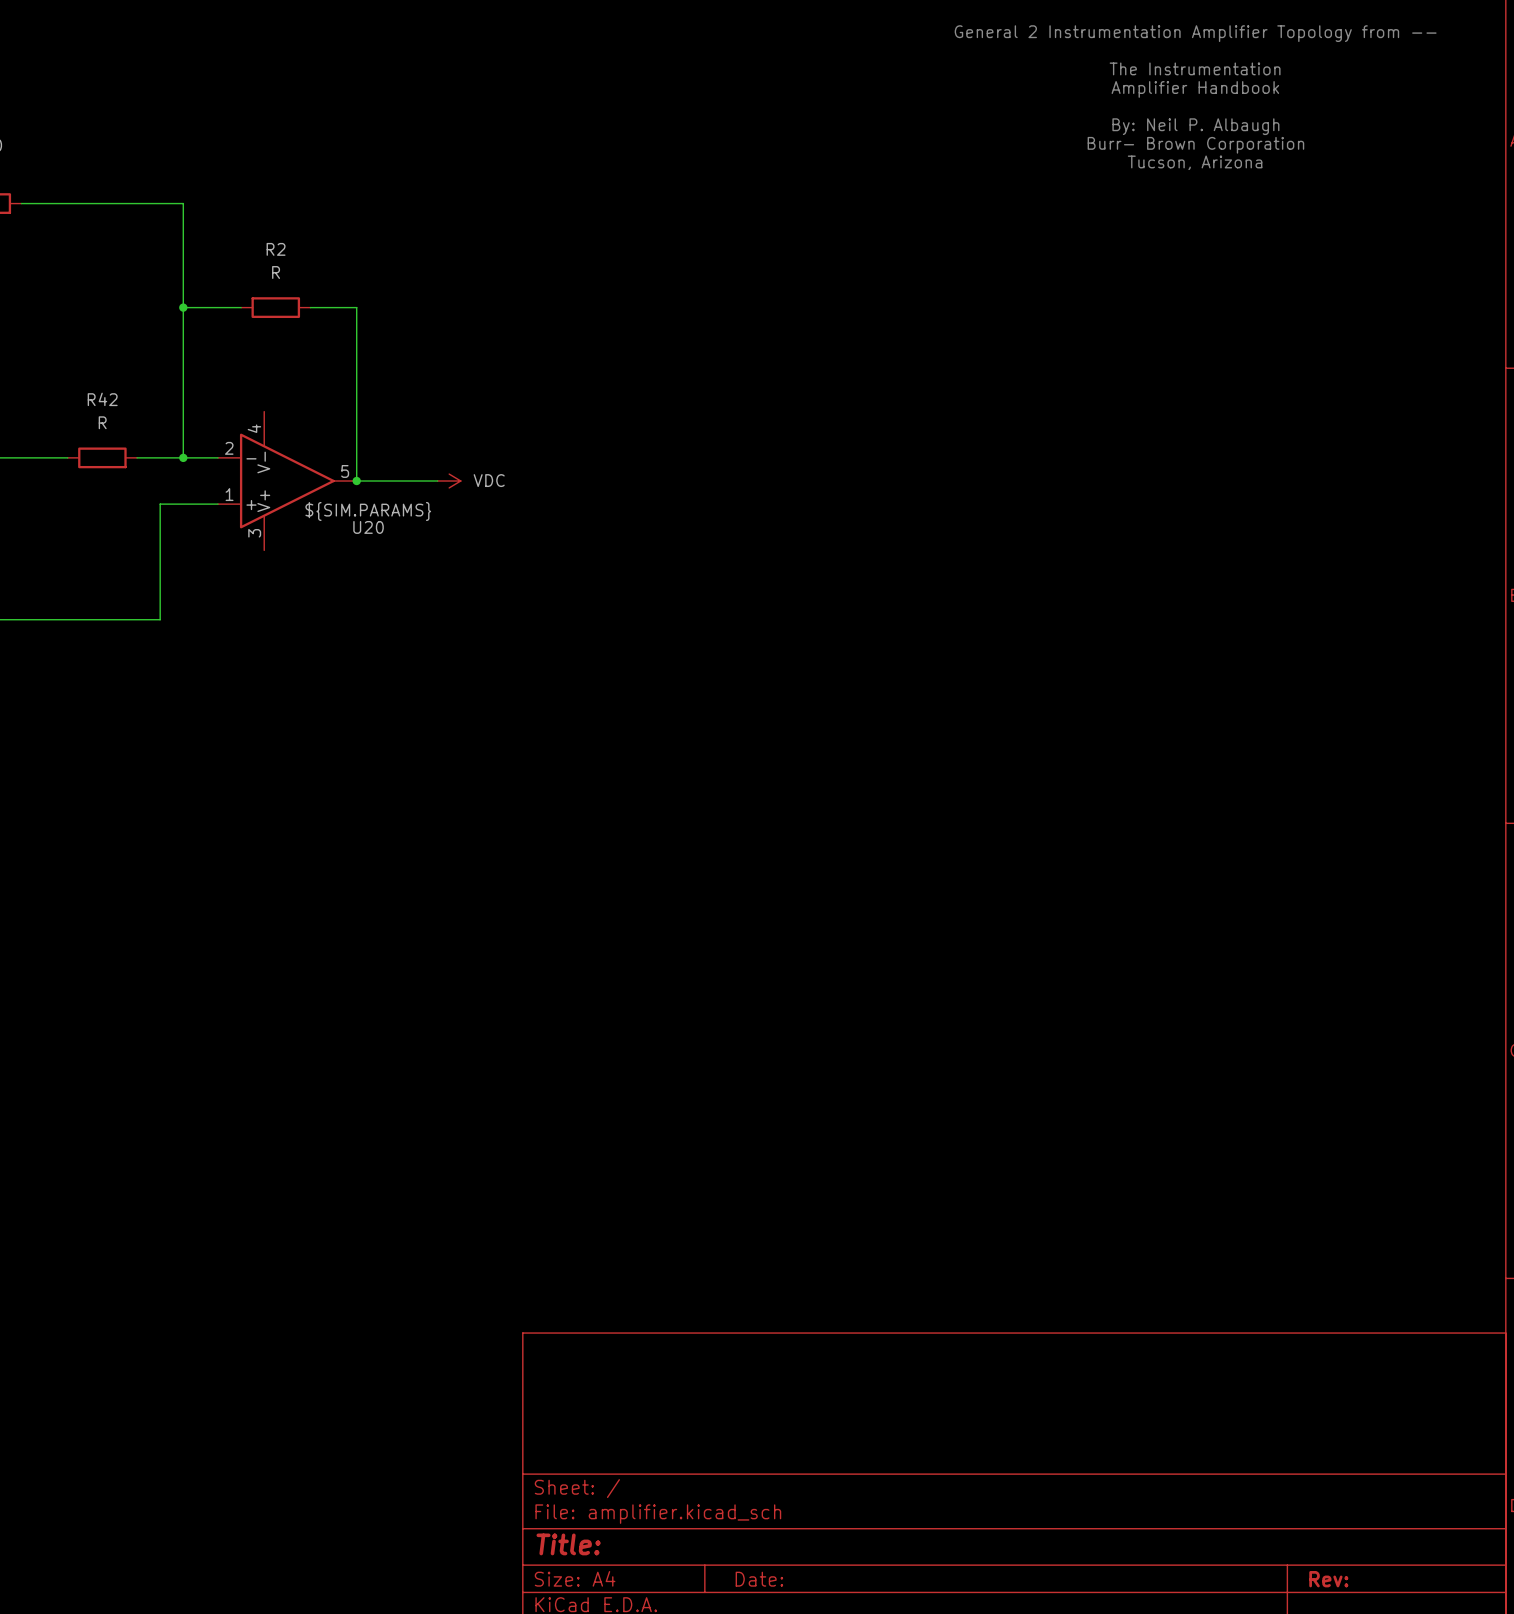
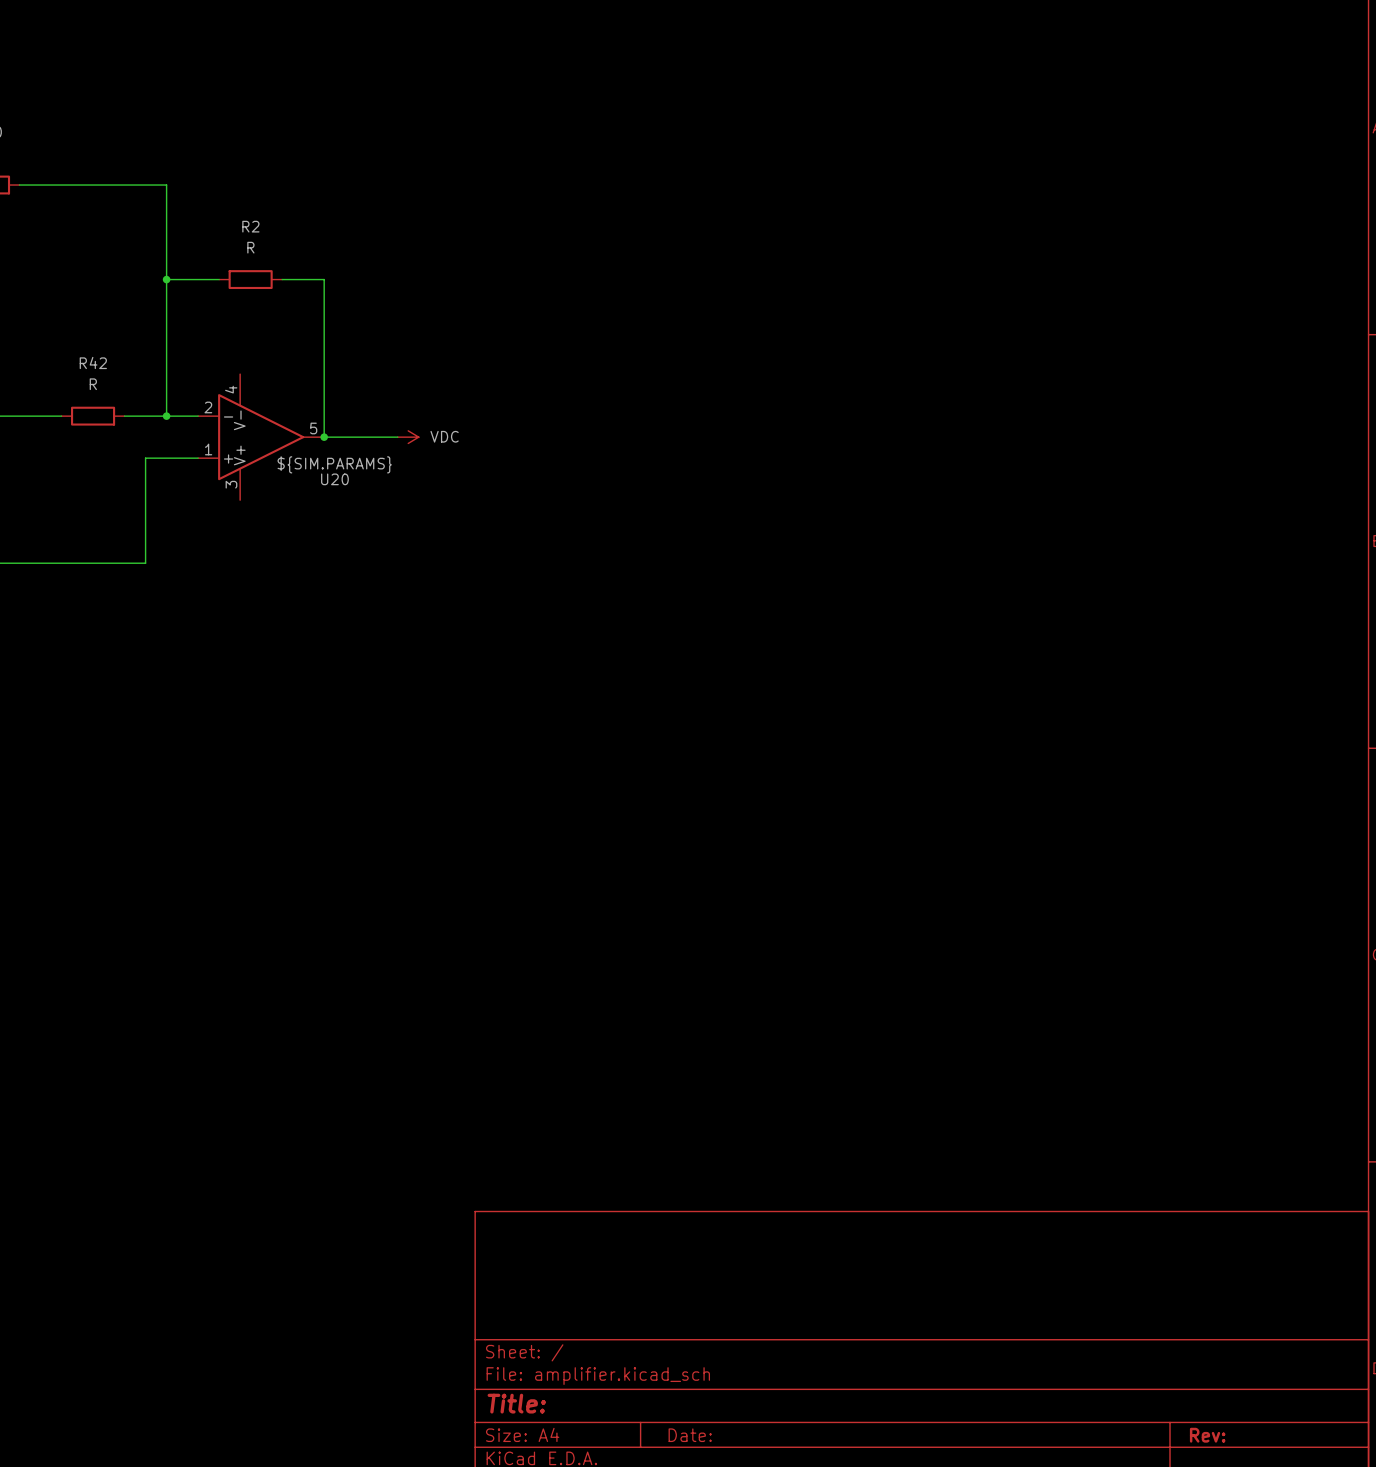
text: General 2 Instrumentation Amplifier Topology from -- (1195, 33) -> none
text: The Instrumentation (1195, 68) -> none
text: Amplifier Handbook (1195, 89) -> none
text: By: Neil P. Albaugh (1195, 126) -> none
text: Burr- Brown Corporation (1195, 145) -> none
text: Tucson, Arizona (1195, 162) -> none

